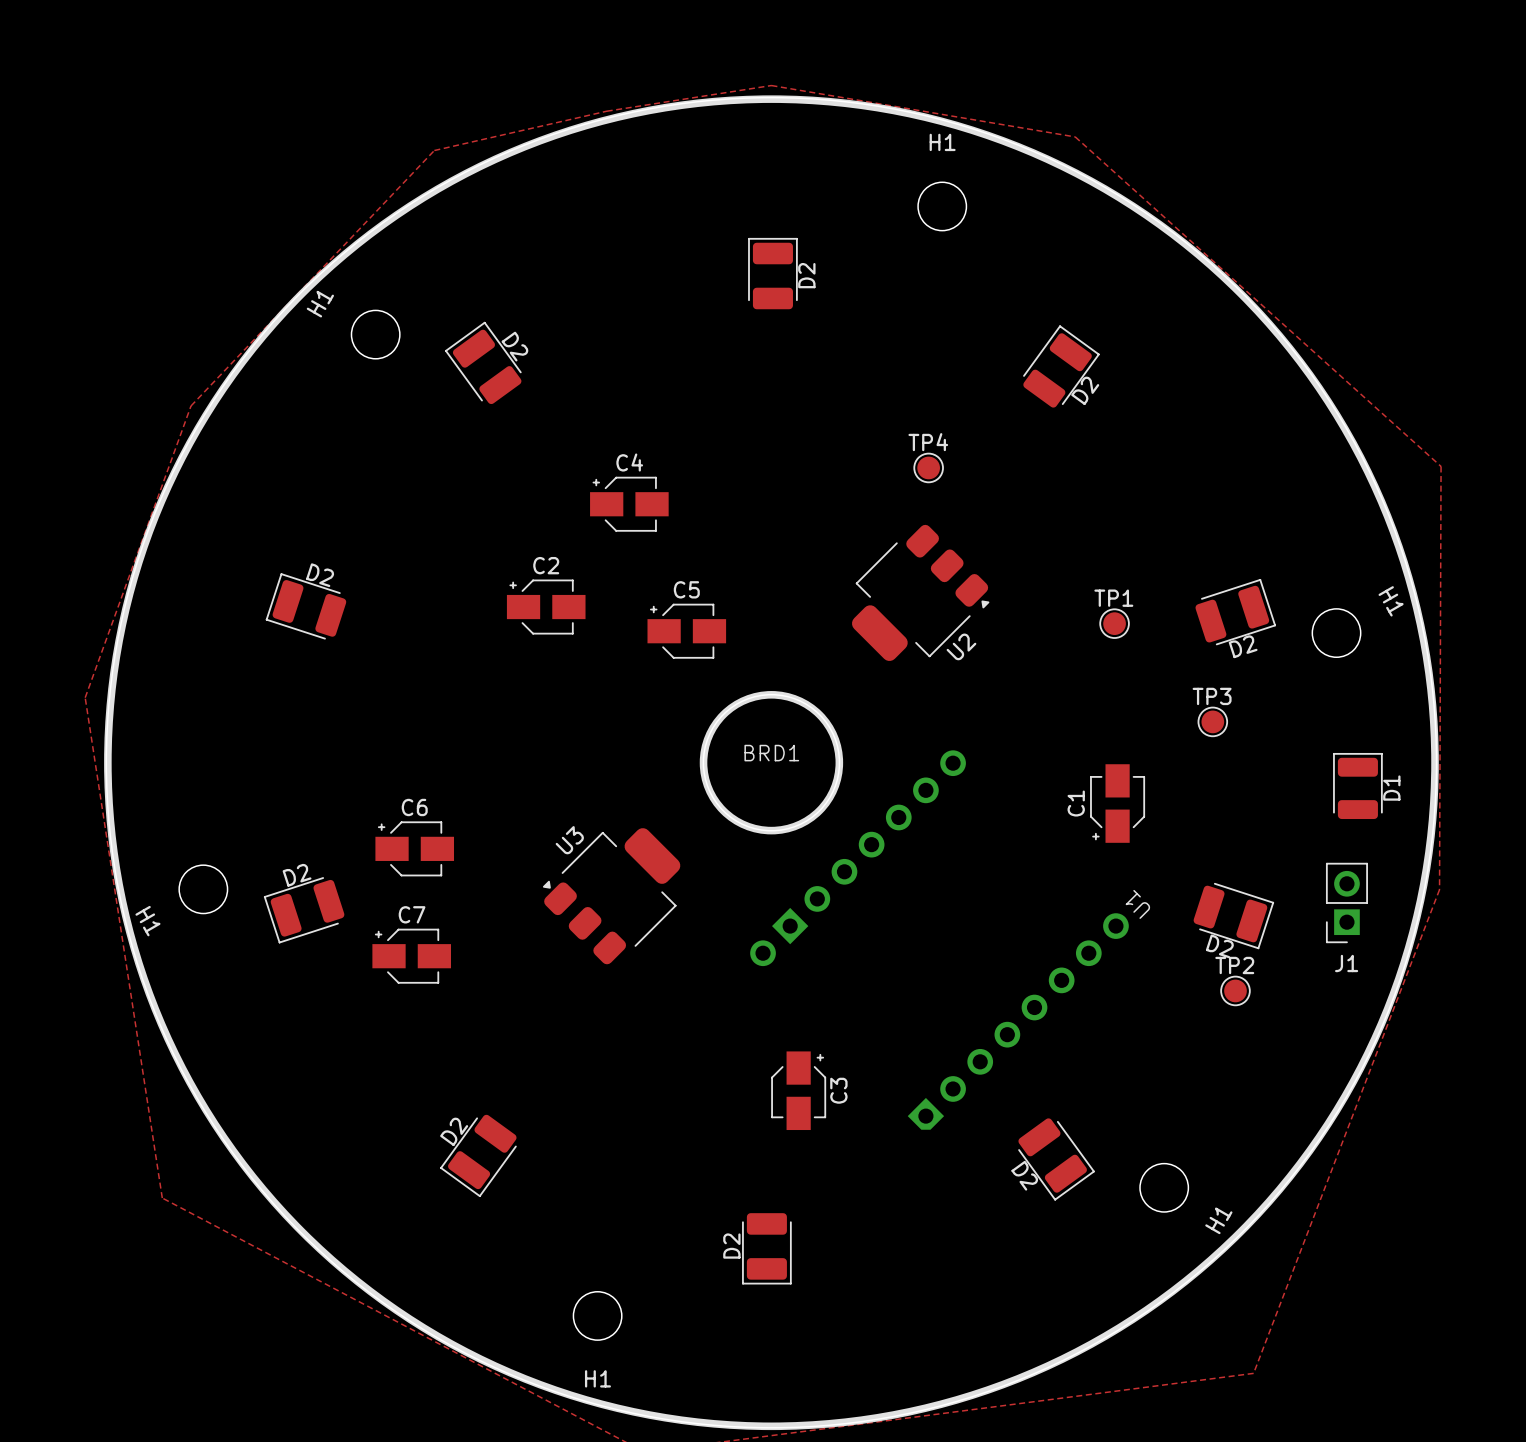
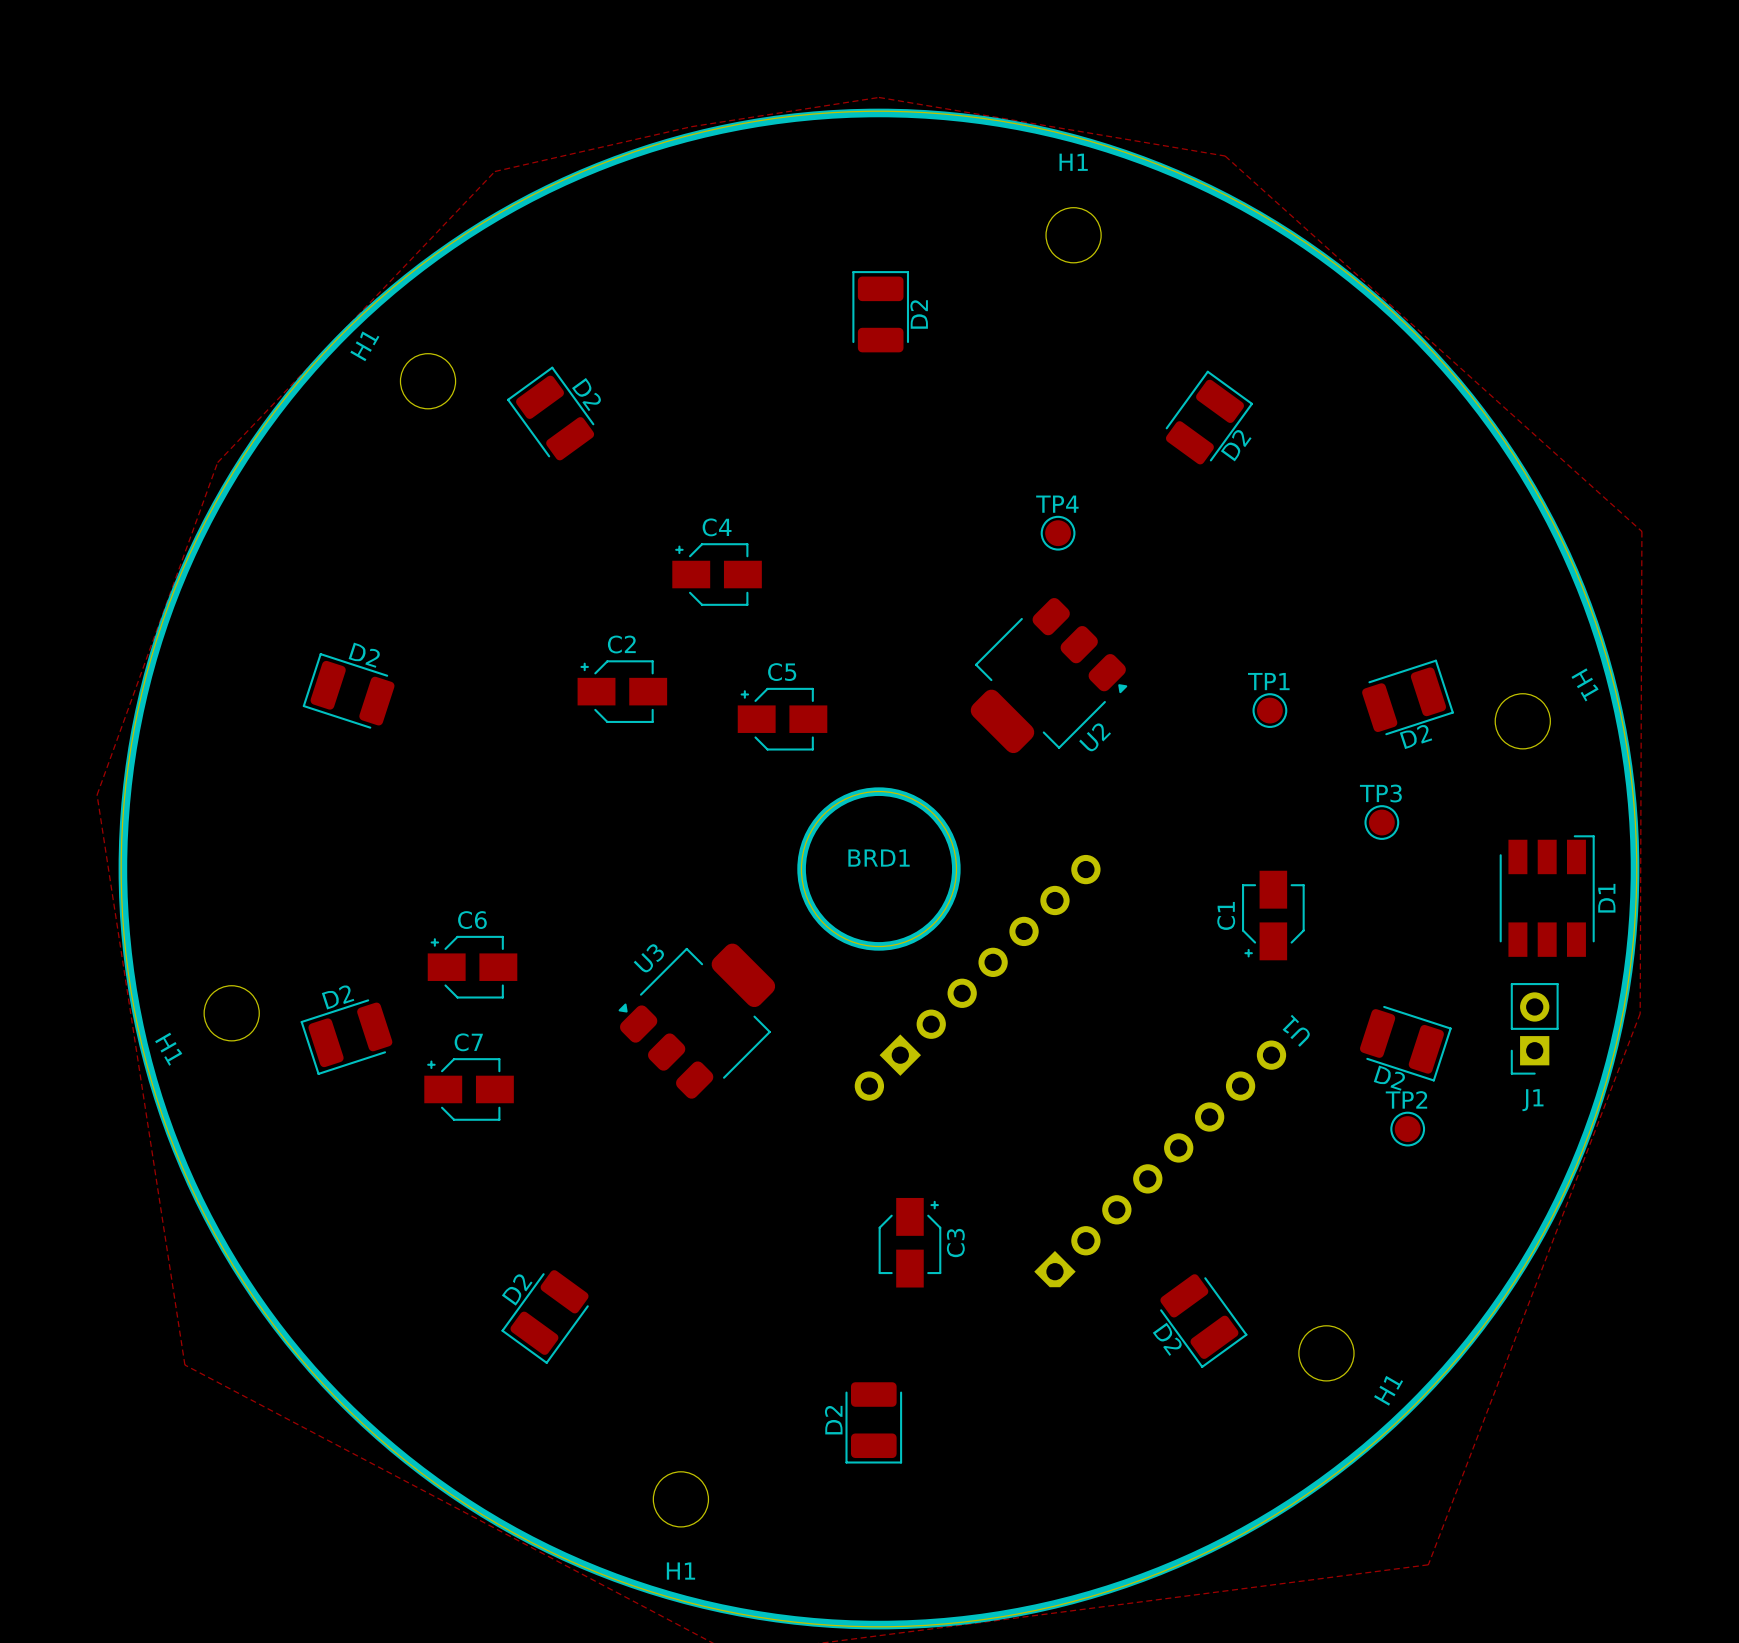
D1 footprint: [1333, 752, 1383, 820] -> [1499, 835, 1595, 957]

